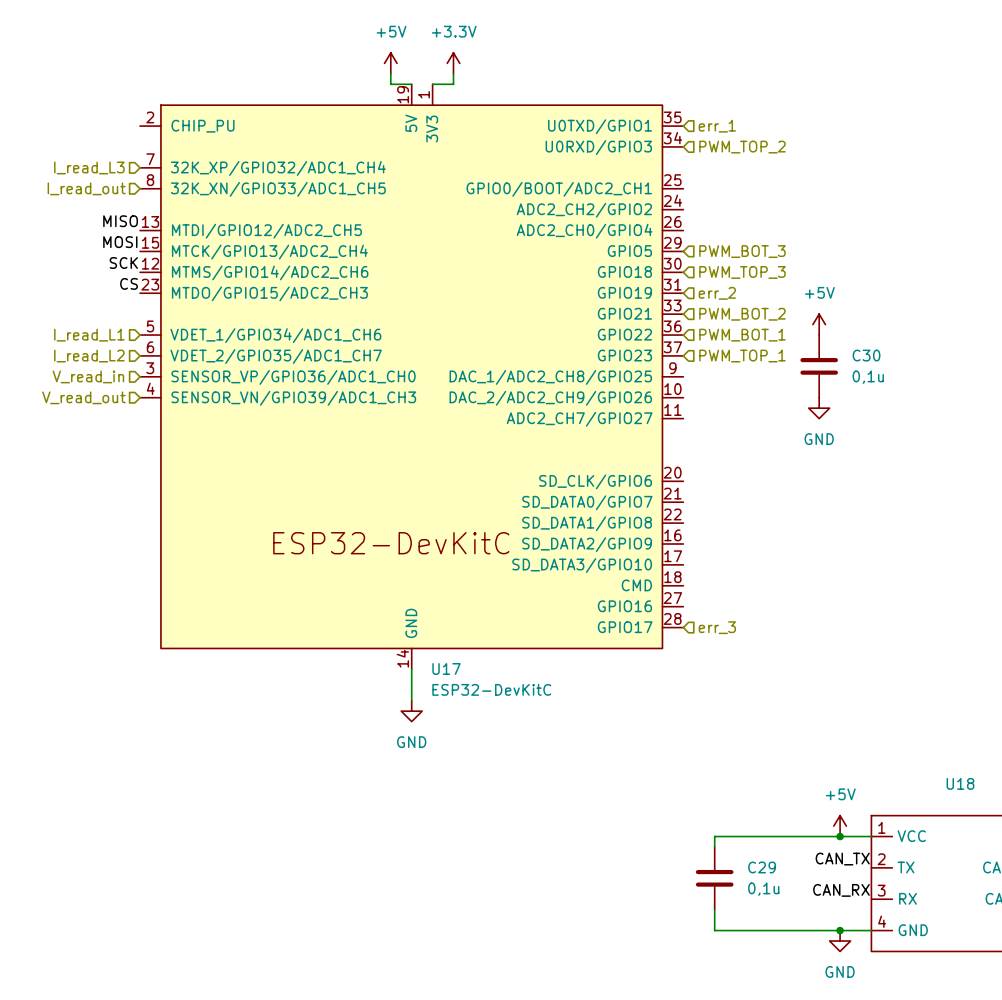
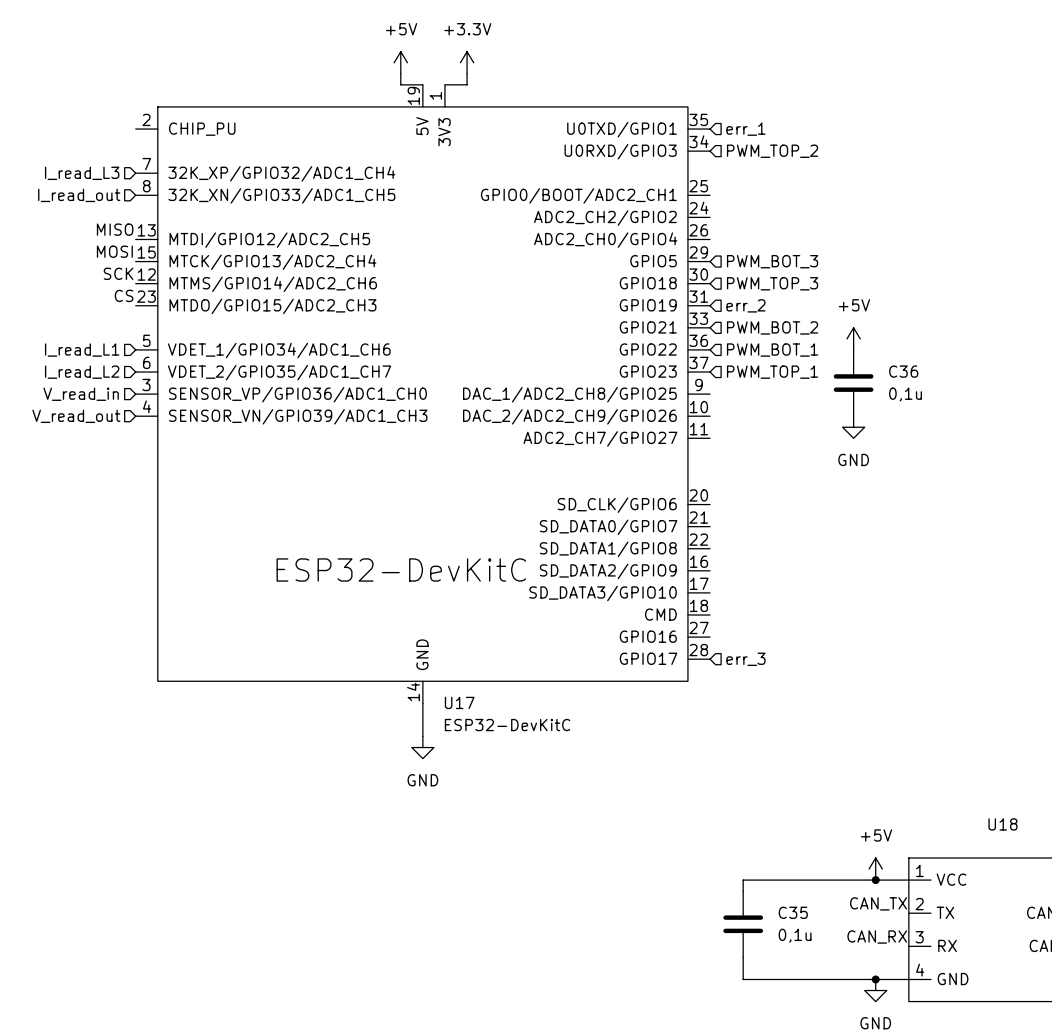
C30 name: C30 (866, 355) -> C36 (903, 371)
C29 name: C29 (762, 867) -> C35 (793, 912)

